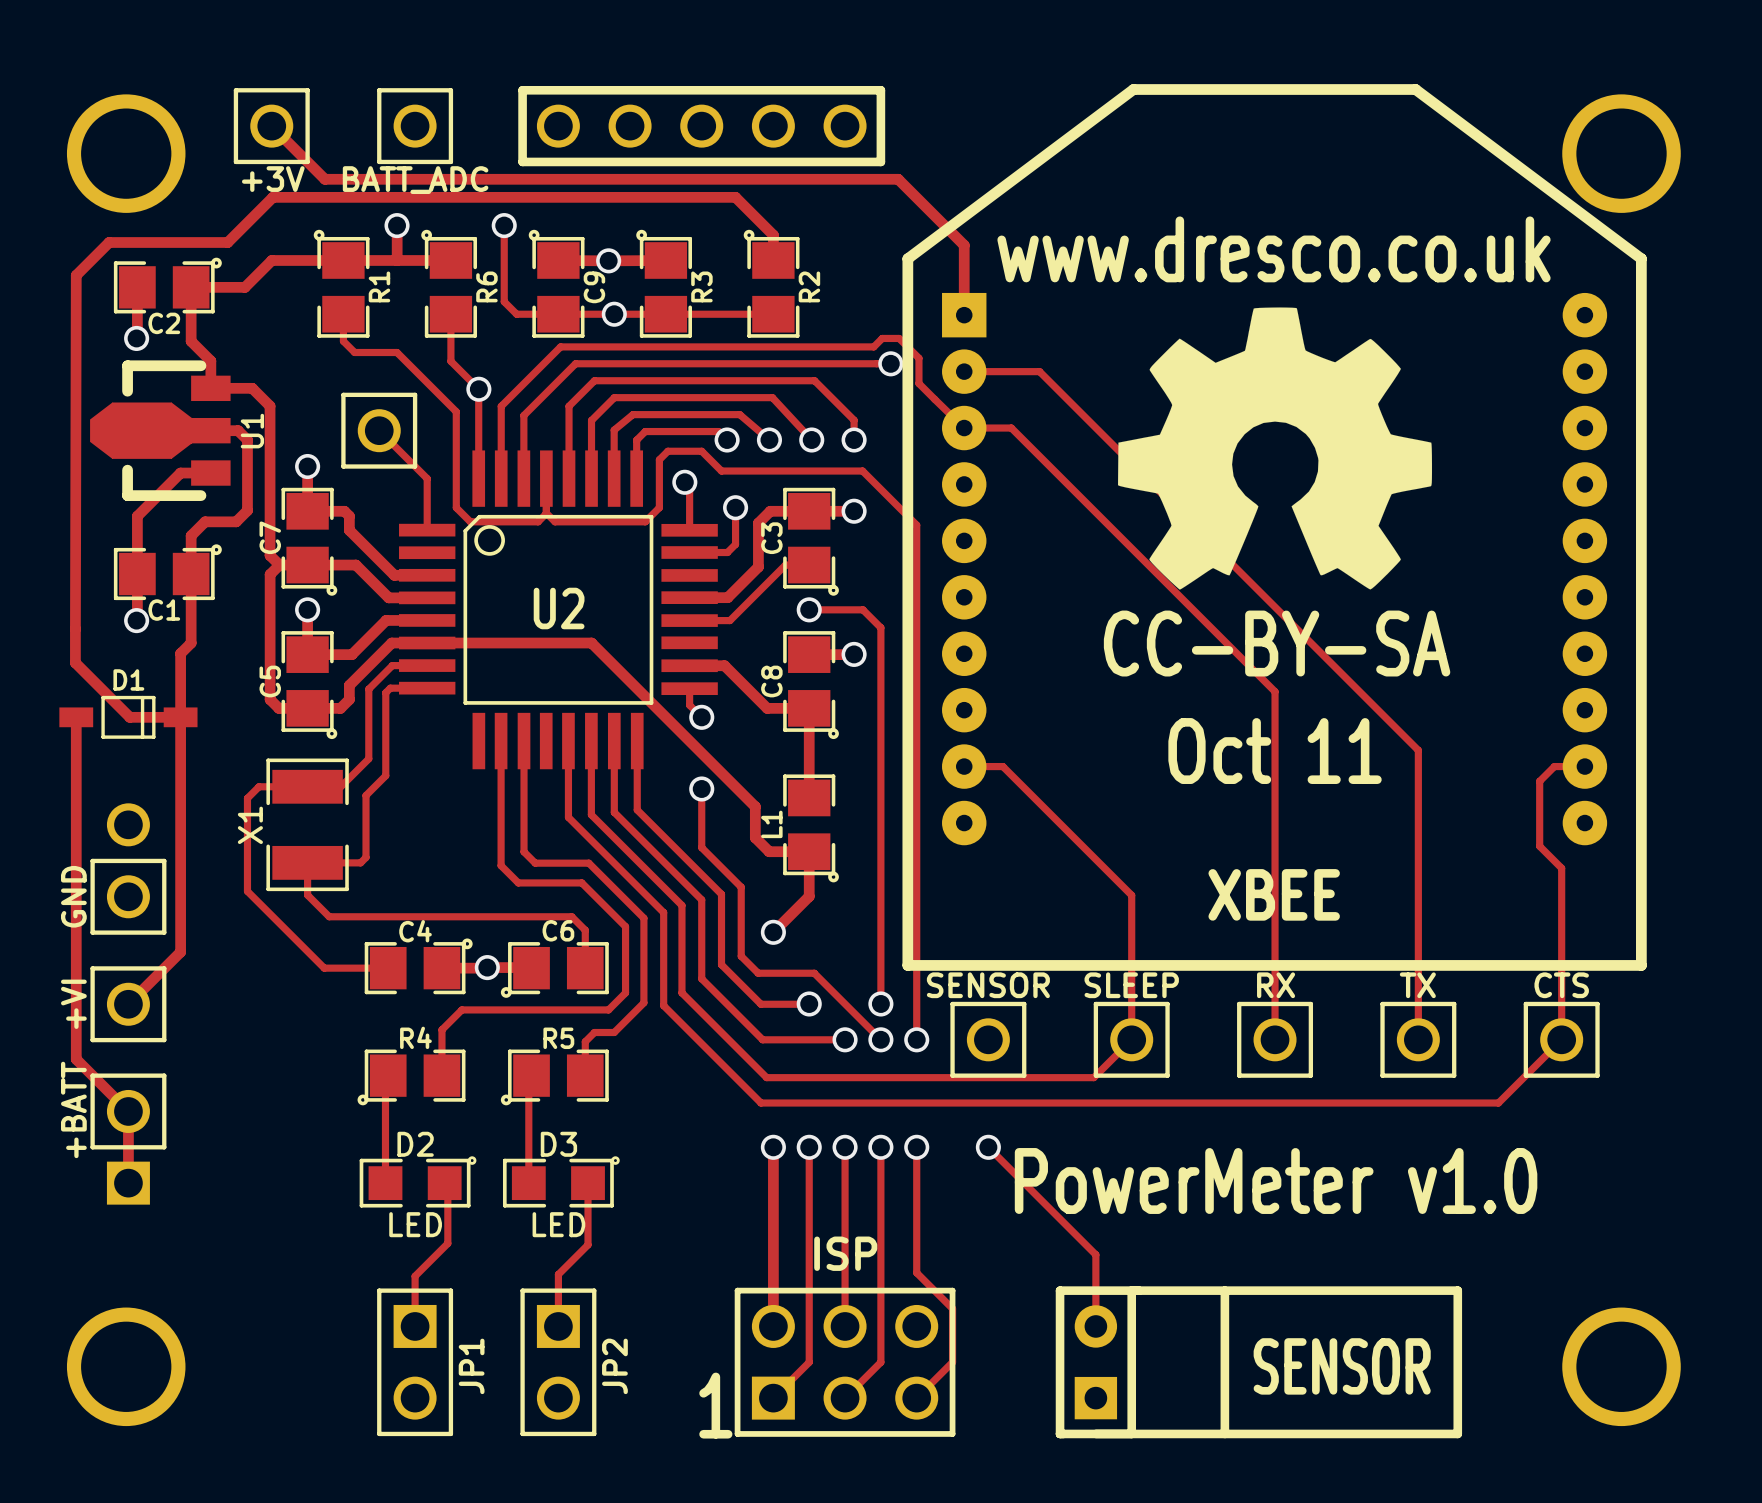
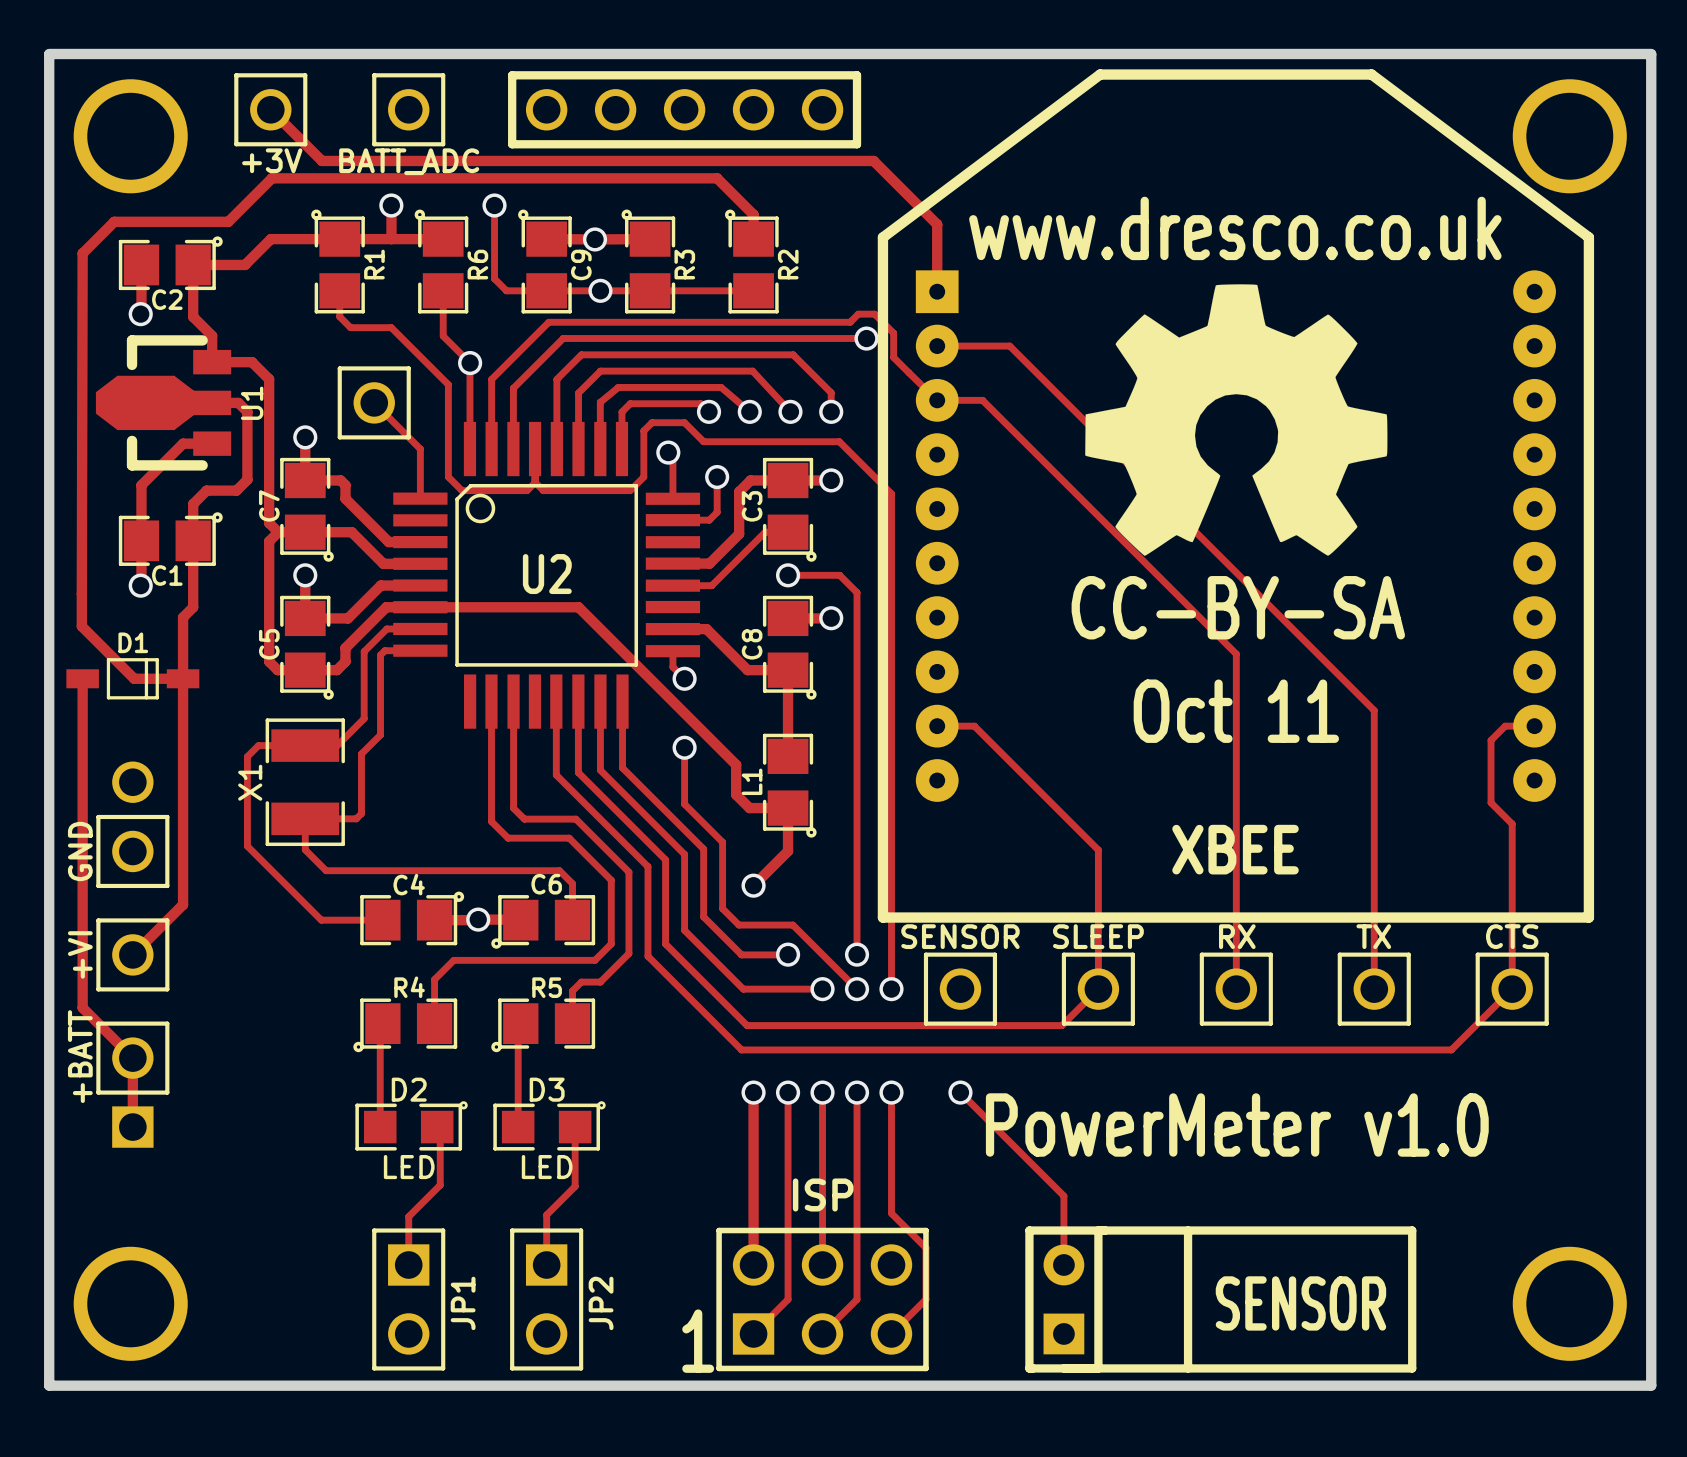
board edge: none -> (49, 53) (1651, 53)
board edge: none -> (49, 54) (49, 1385)
board edge: none -> (1651, 54) (1651, 1385)
board edge: none -> (49, 1385) (1651, 1385)

